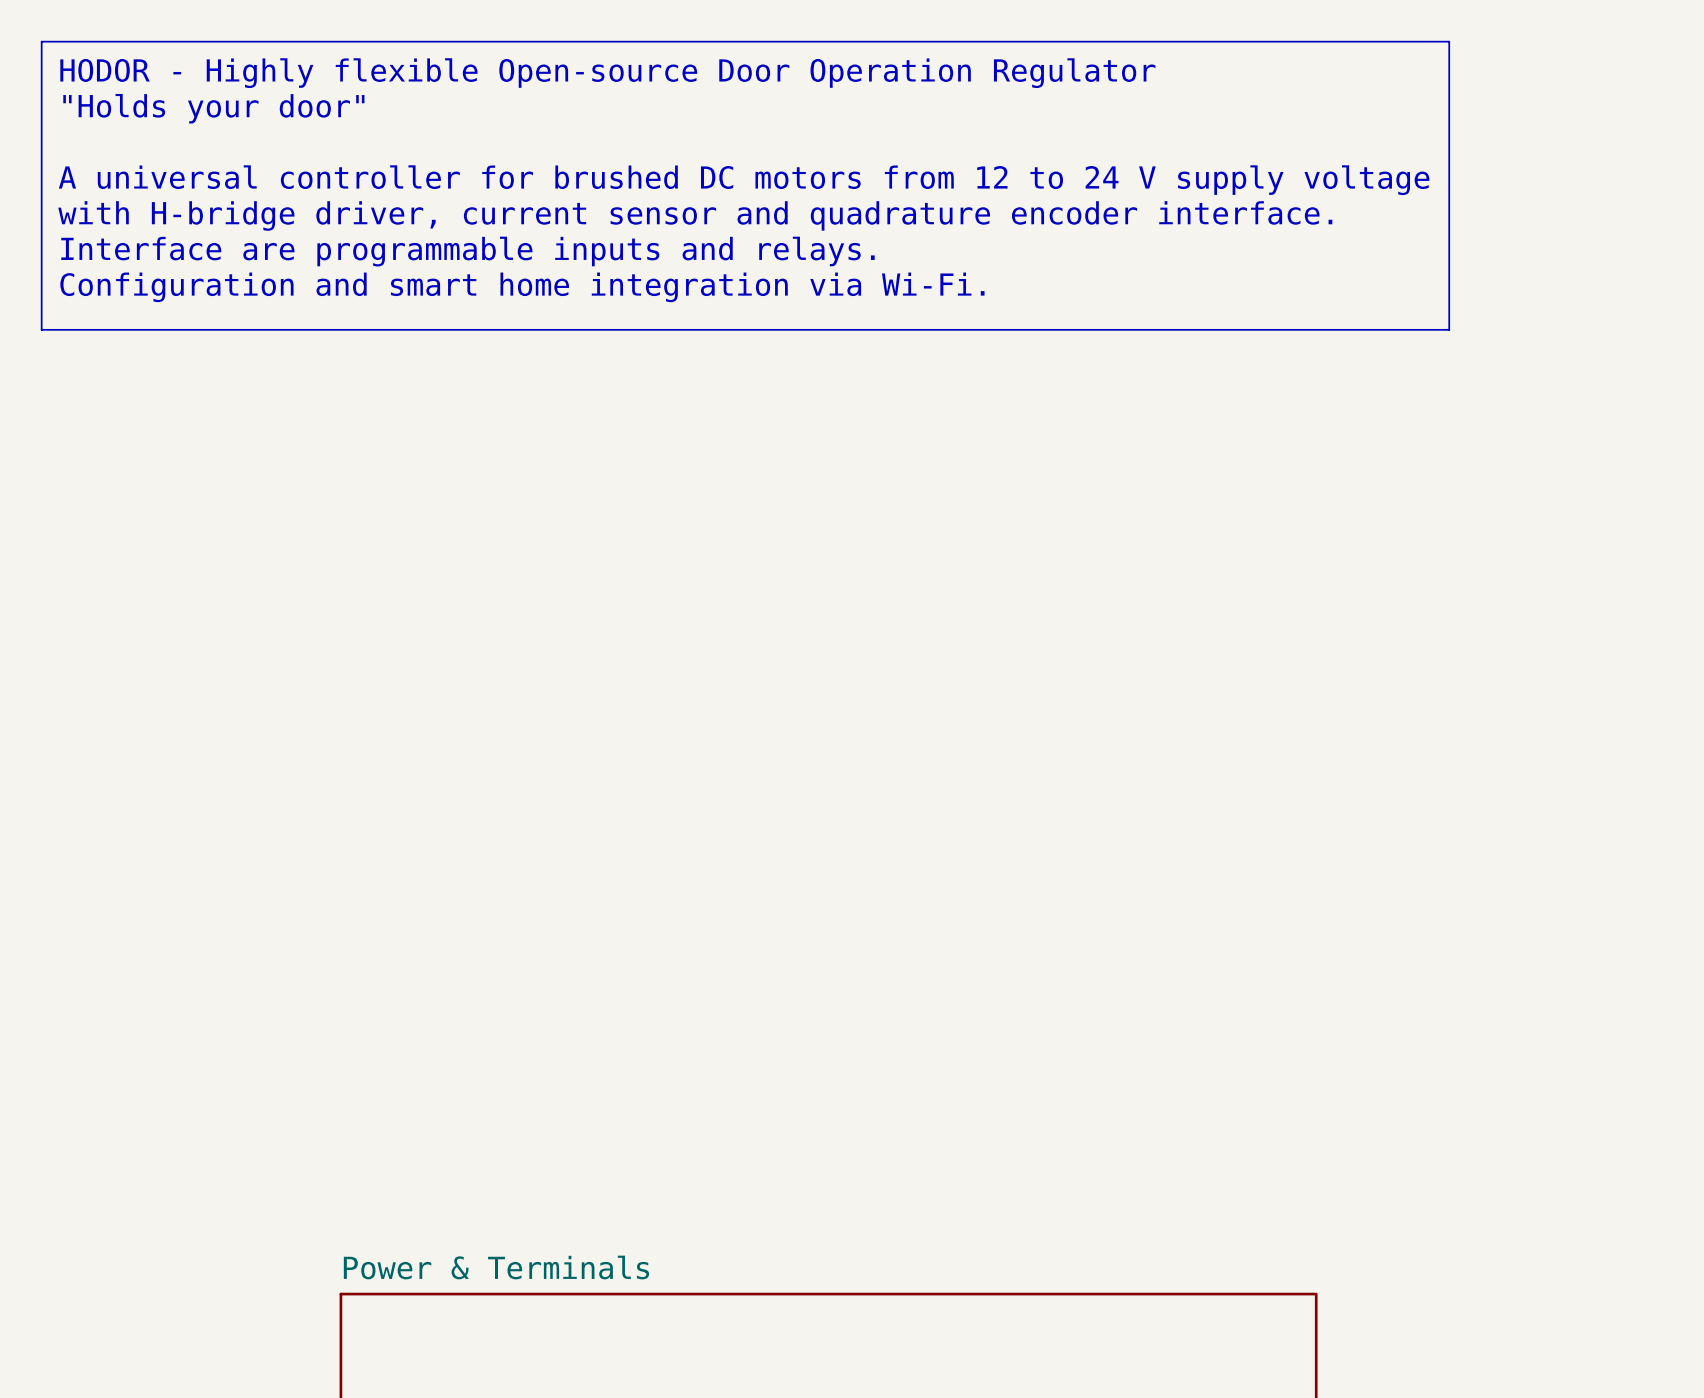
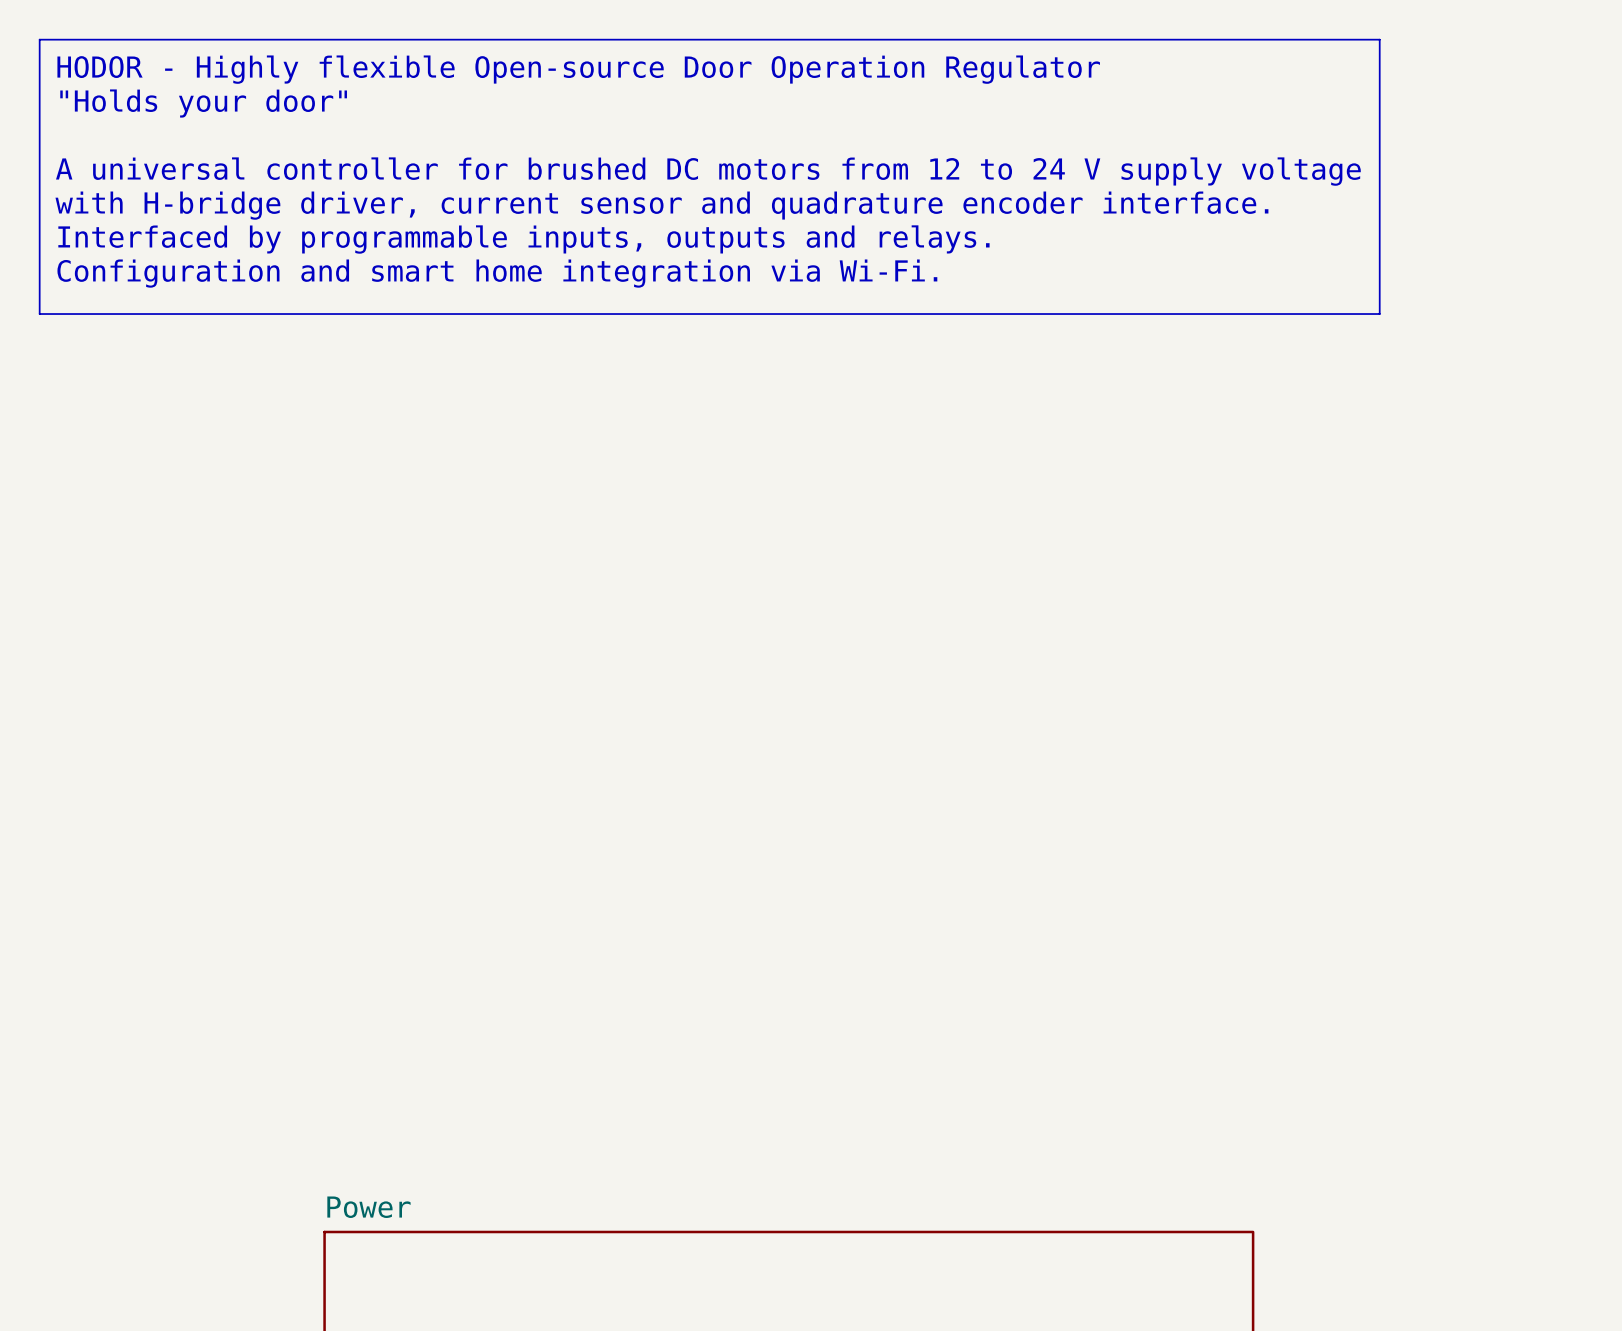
text: Interface are programmable inputs and relays. (467, 251) -> Interfaced by programmable inputs, outputs and relays. (523, 239)
sheet Power & Terminals name: Power & Terminals (496, 1267) -> Power (368, 1207)

